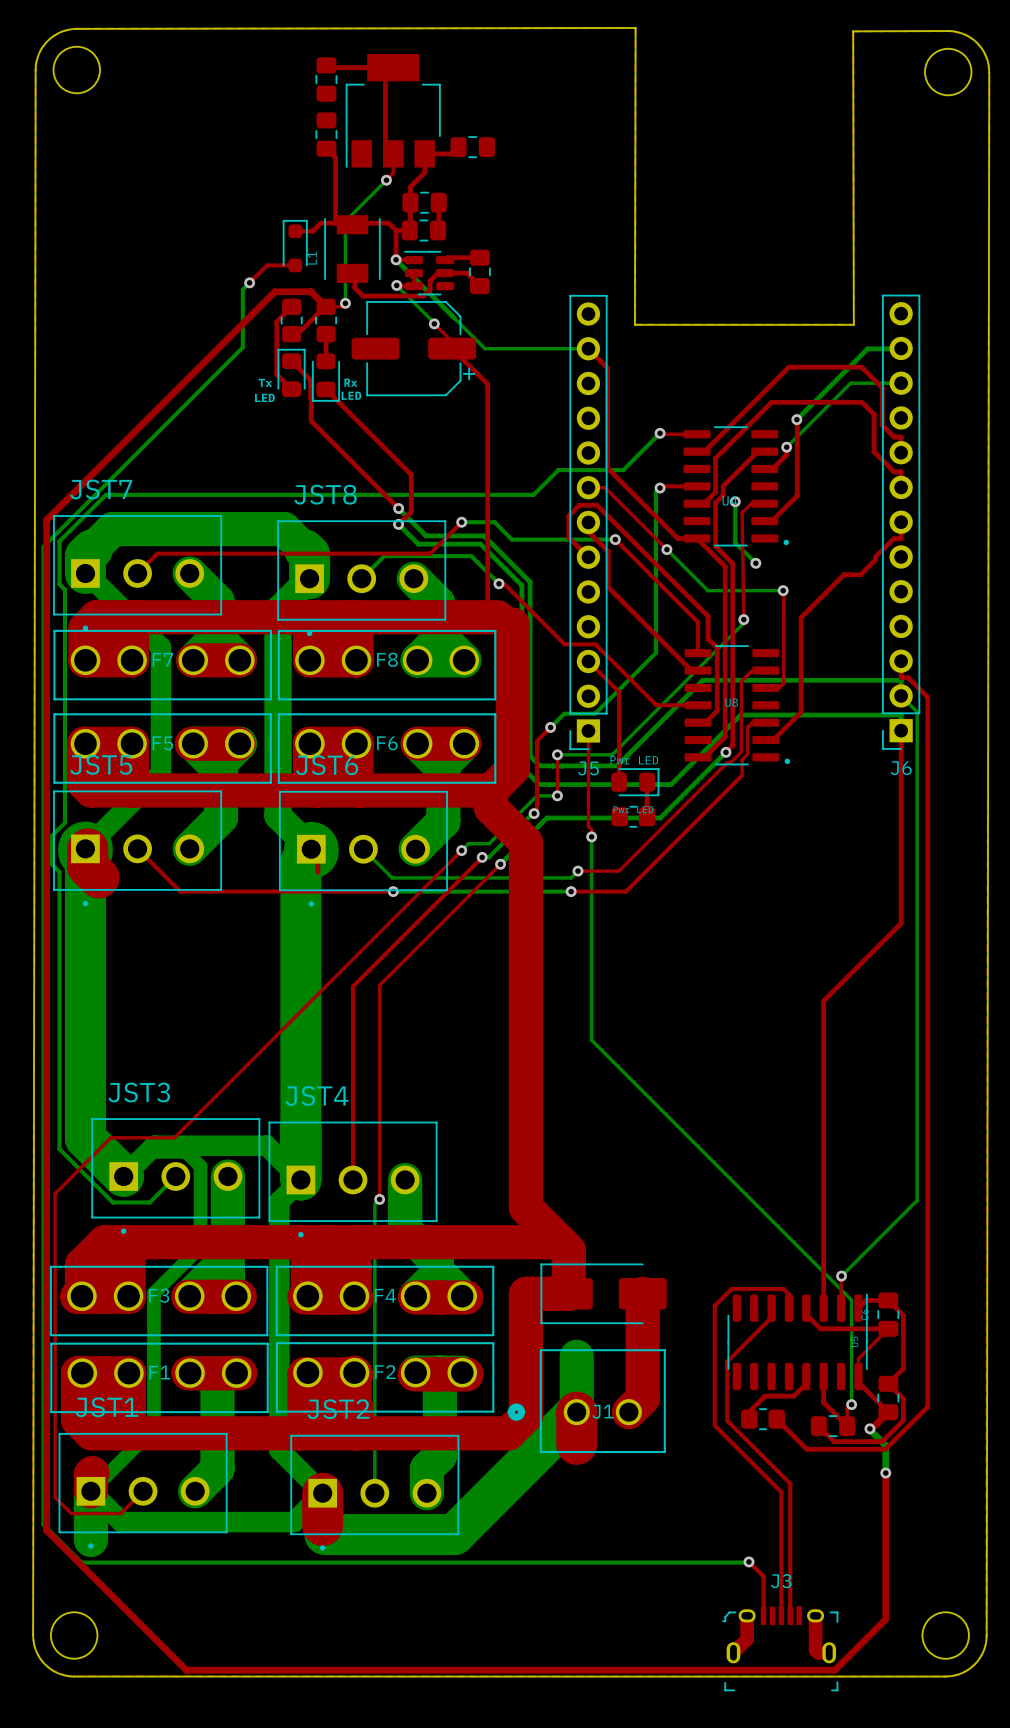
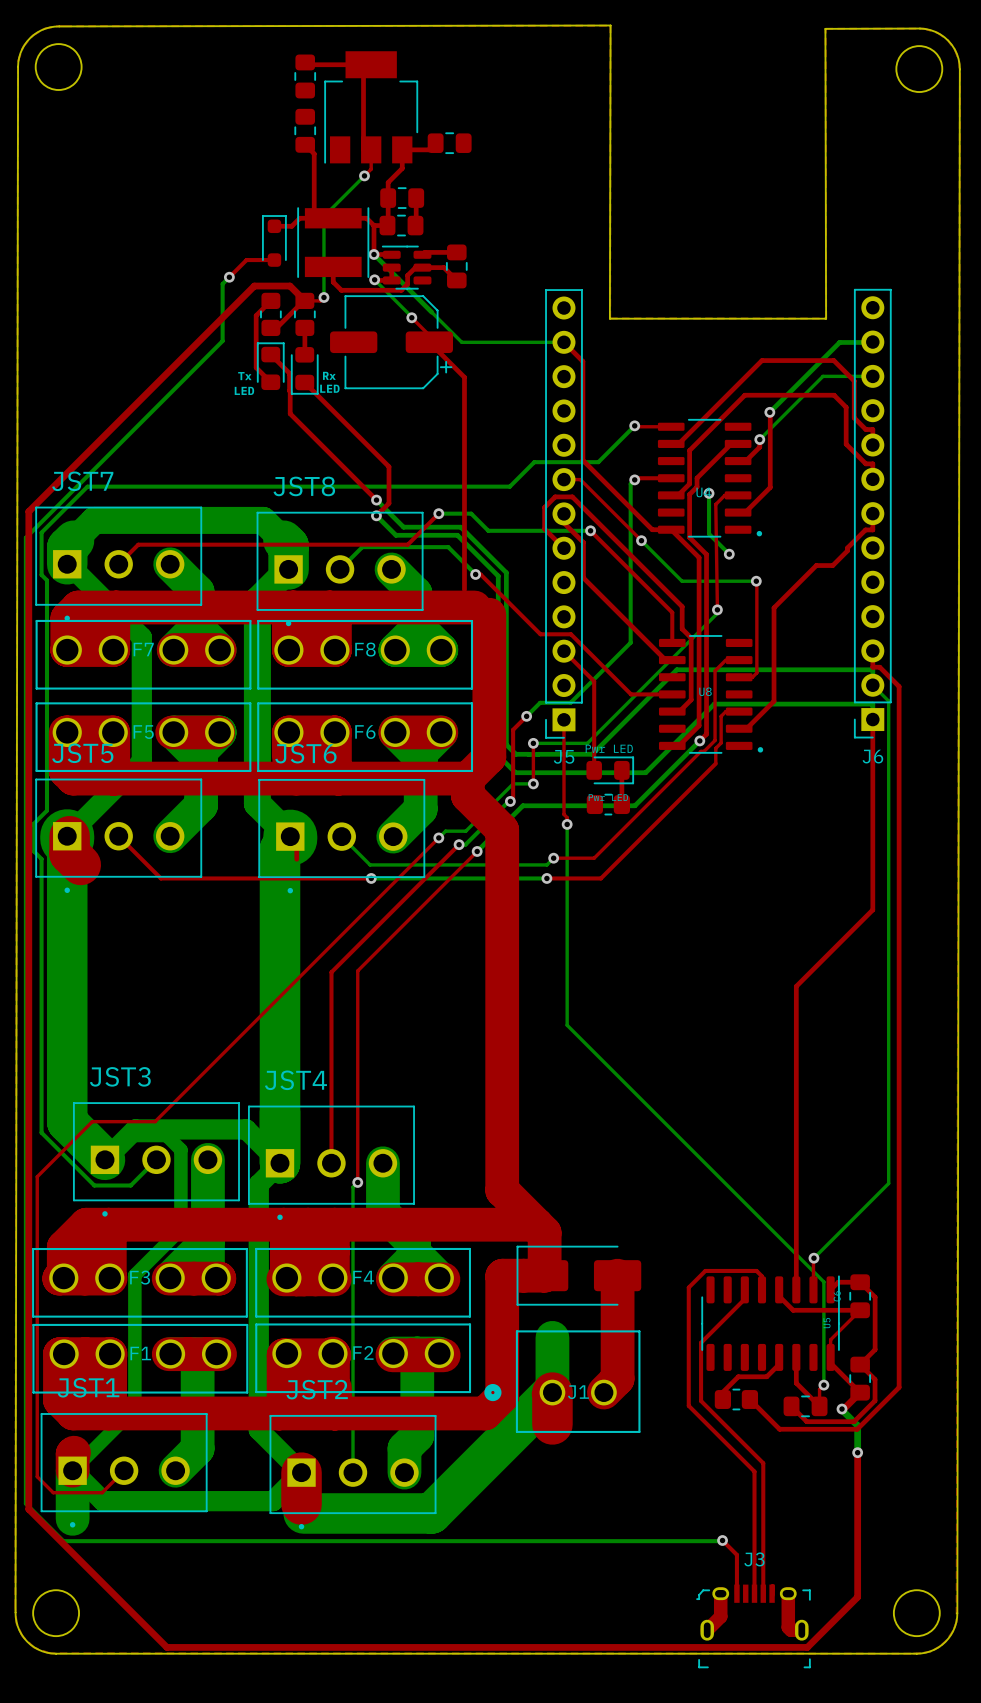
part: none -> (333, 242)
L1: (352, 249) -> none
bottom track width: thick (99, 542) (112, 529) (283, 529) (297, 542) -> thin (80, 533) (94, 520) (263, 520) (276, 533)

